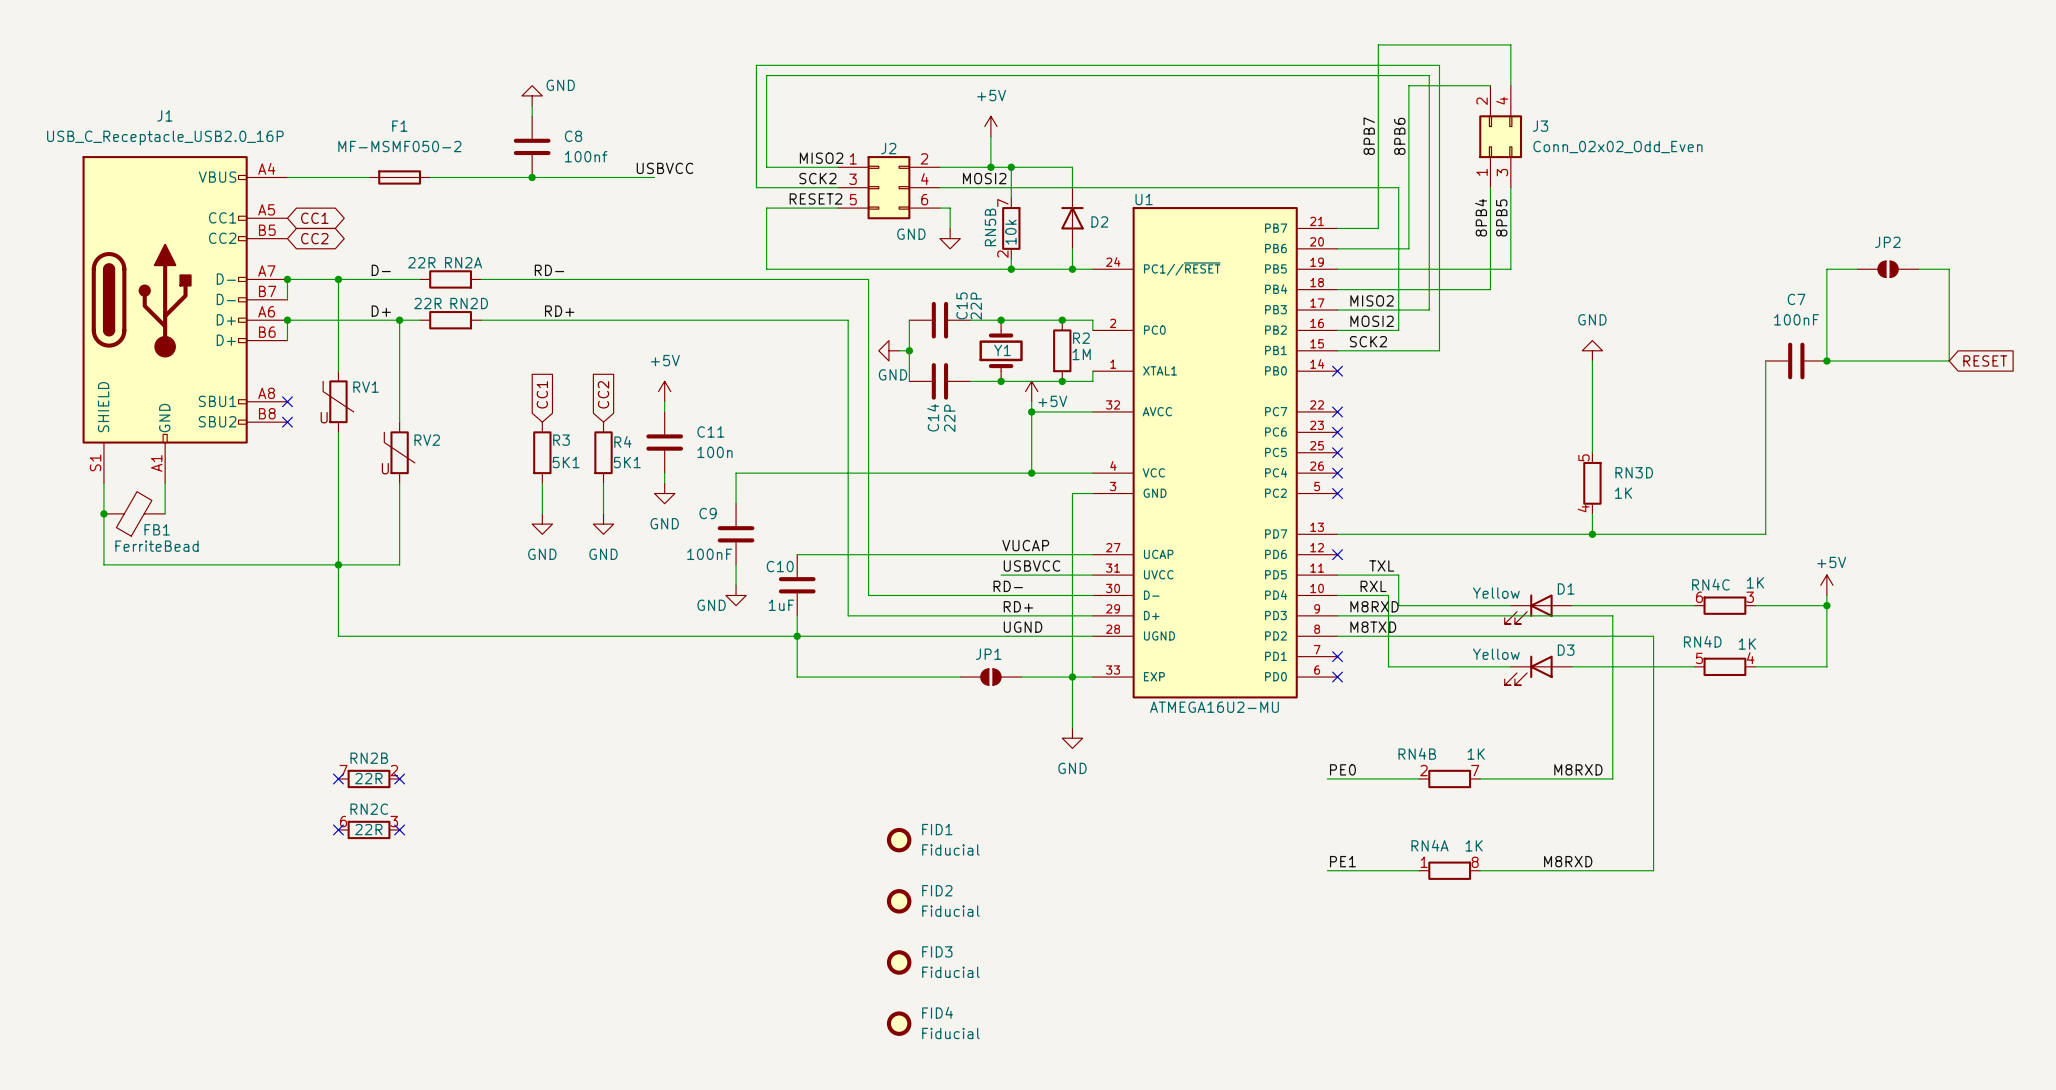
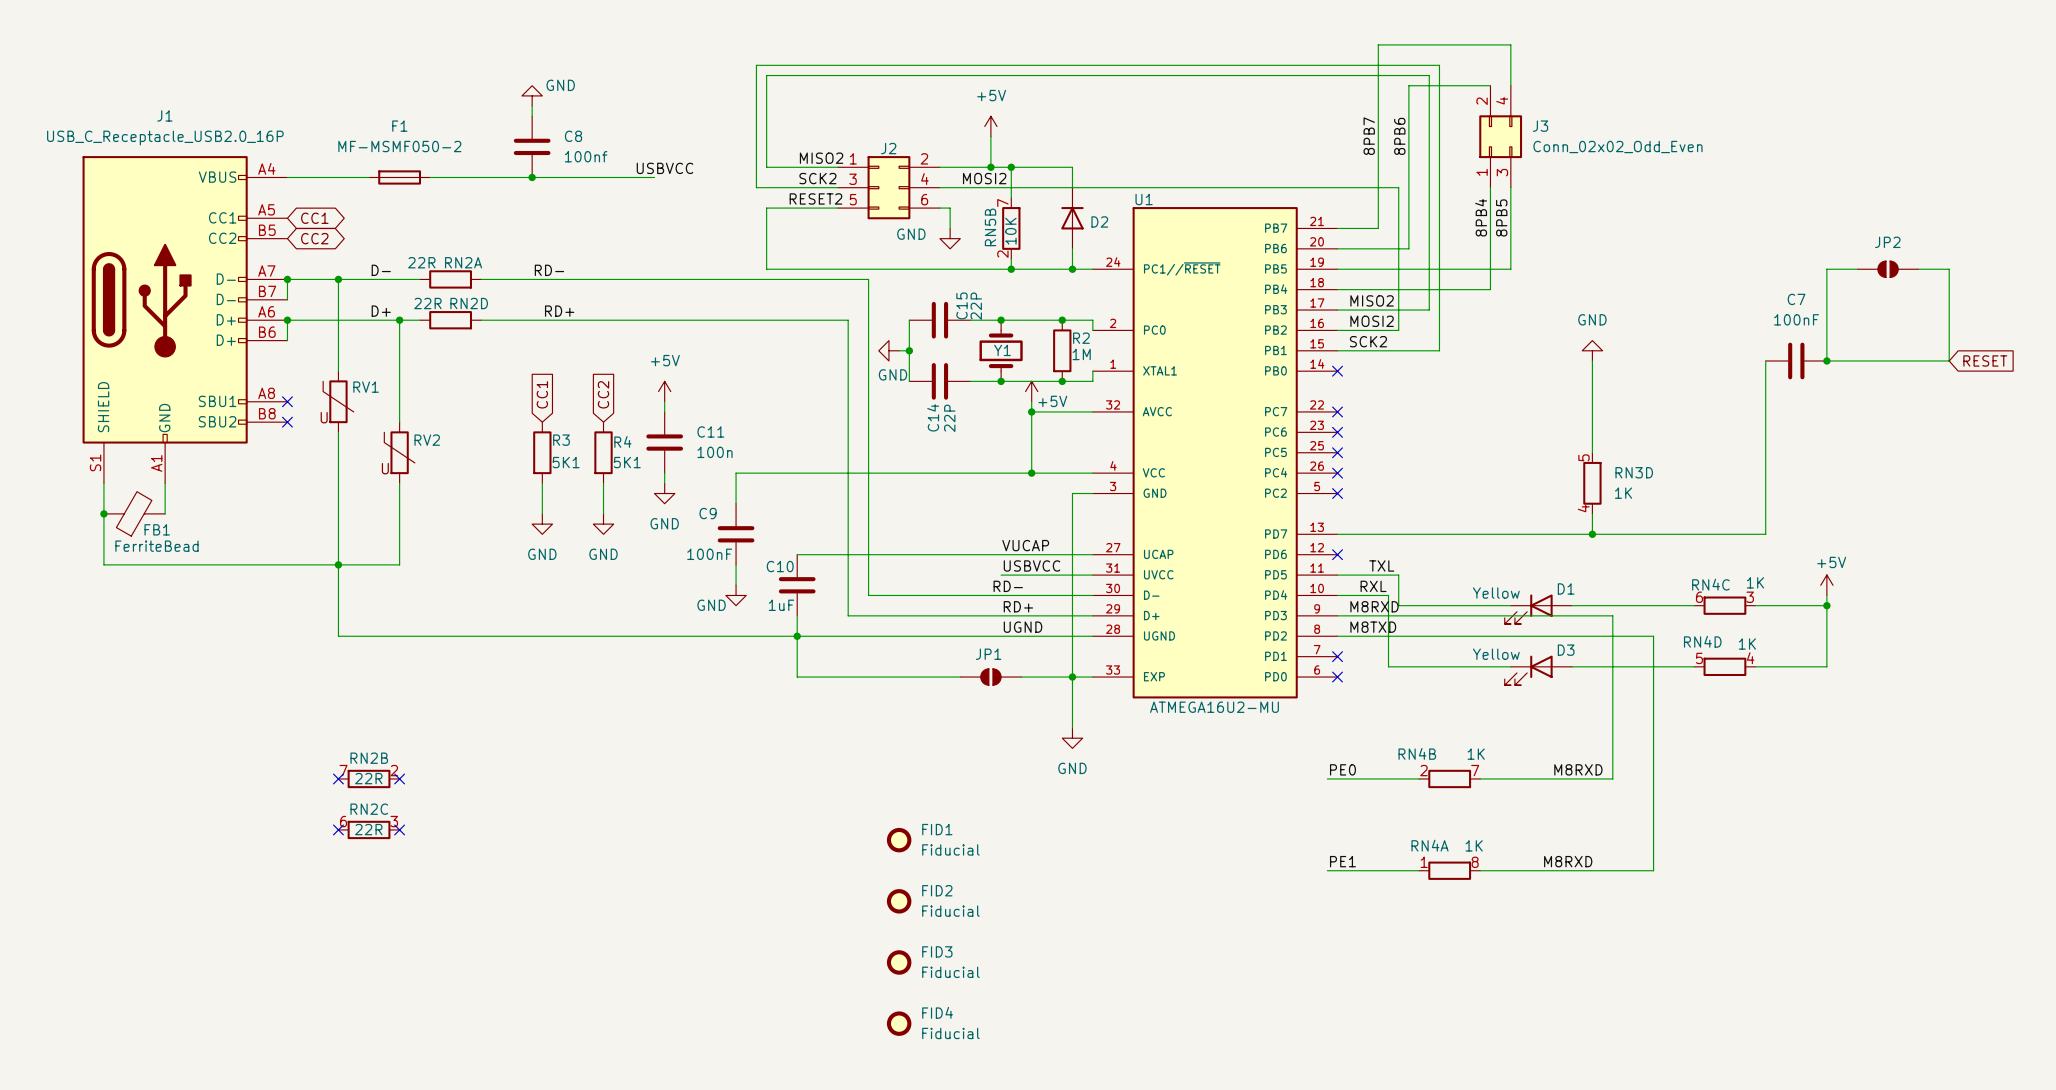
RN5B value: 10k (1010, 232) -> 10K (1010, 231)

